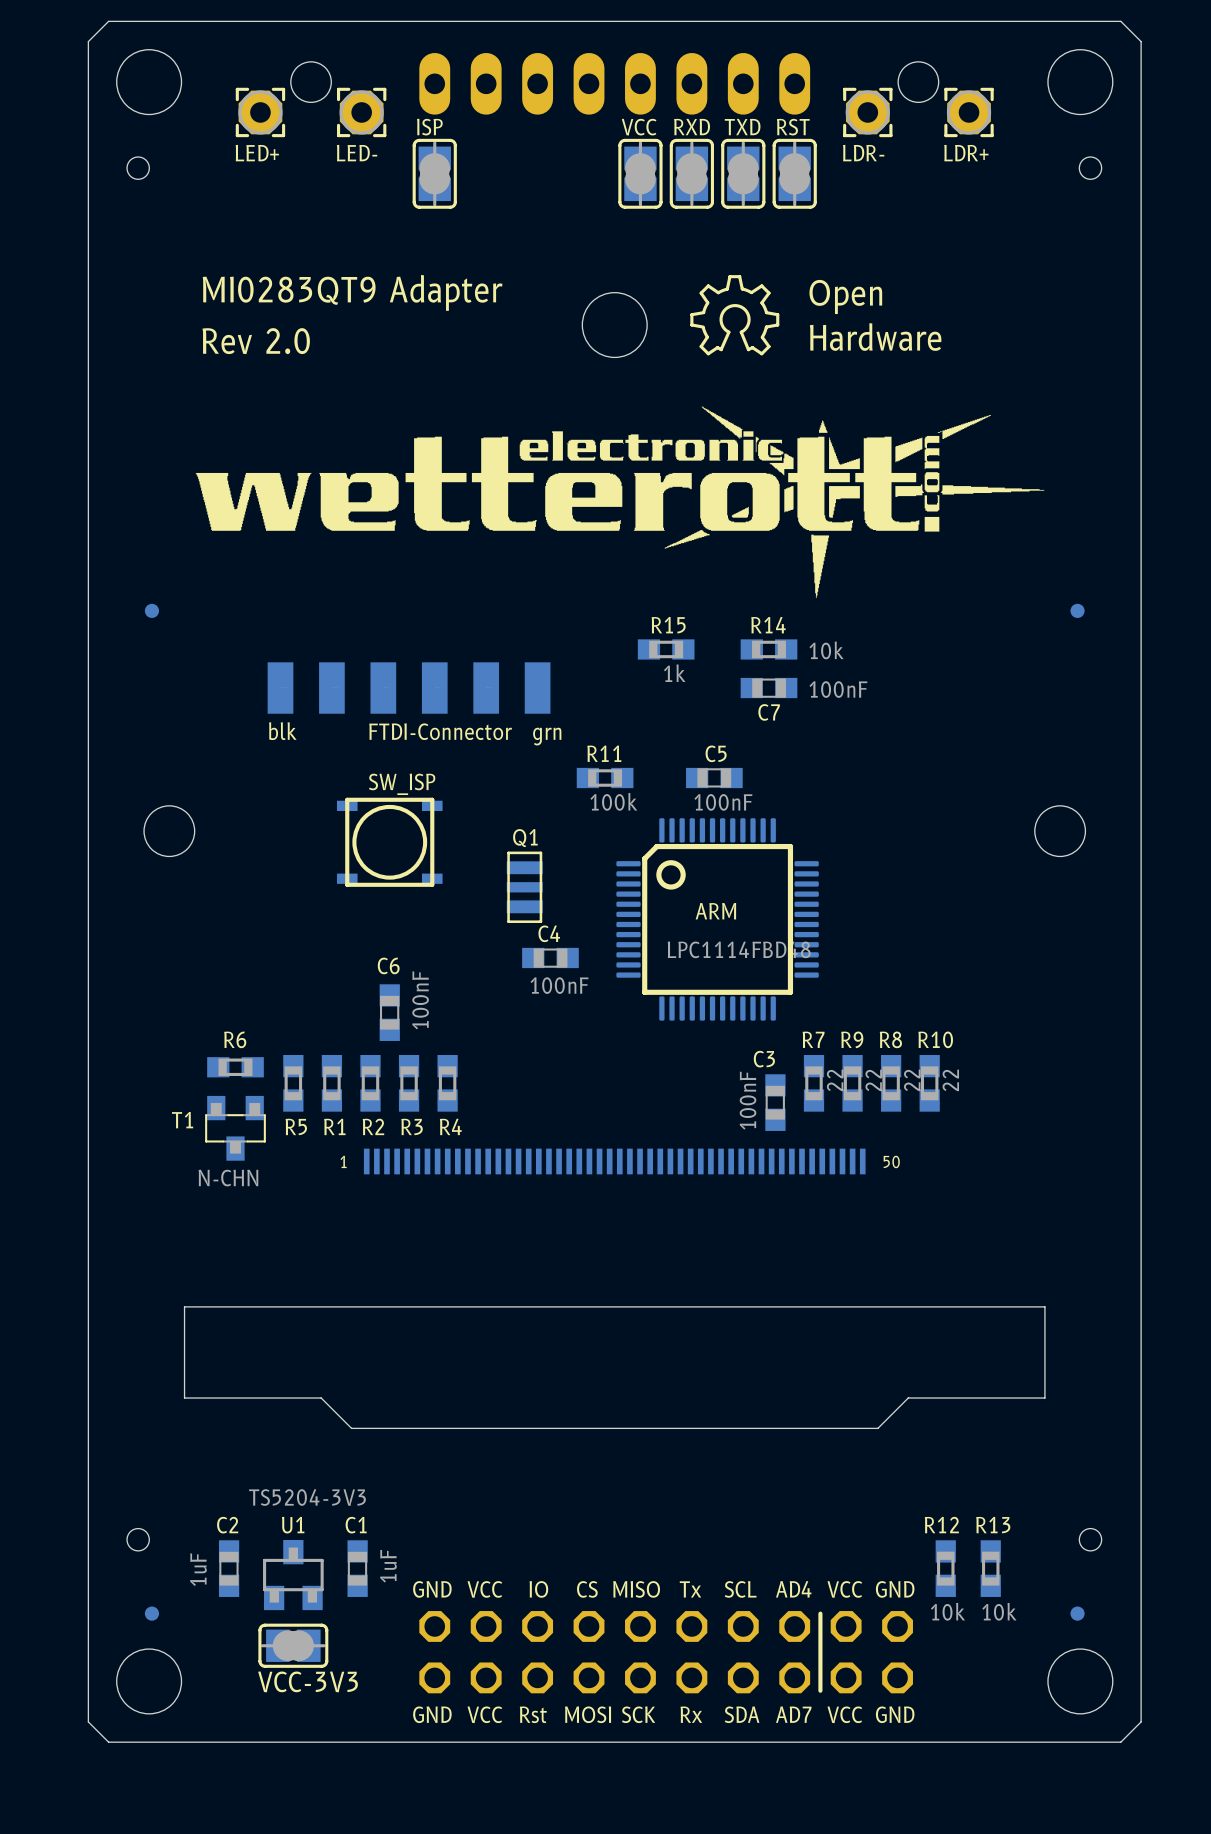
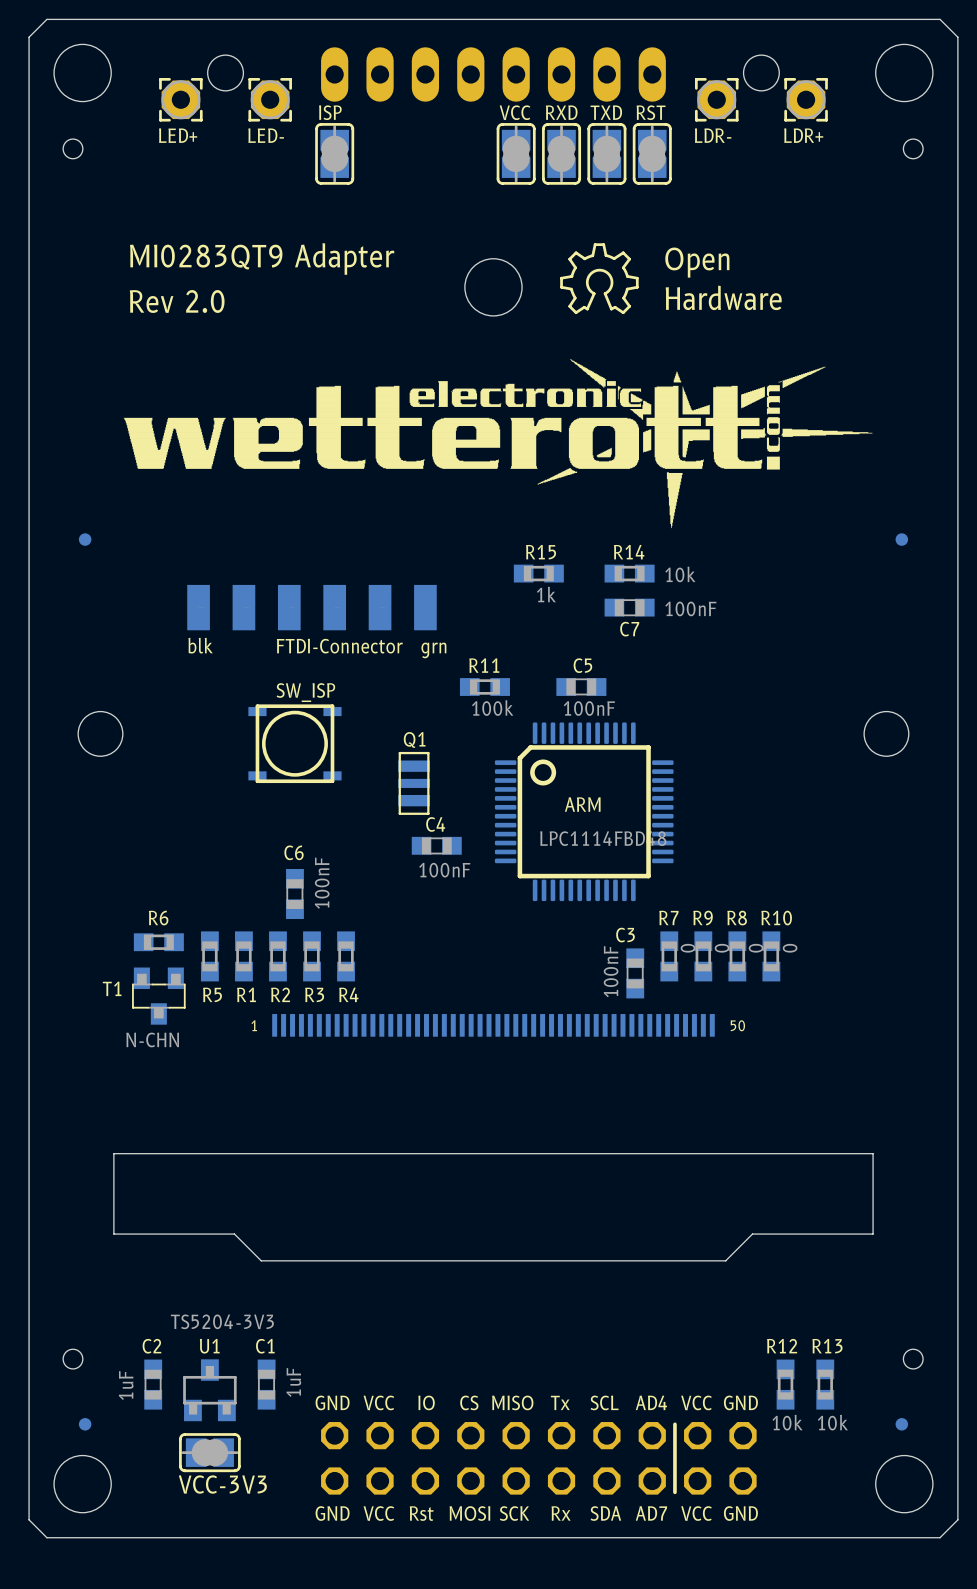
R7 value: 22 (835, 1080) -> 0 (687, 948)
R9 value: 22 (873, 1080) -> 0 (722, 948)
R8 value: 22 (912, 1080) -> 0 (756, 948)
R10 value: 22 (950, 1080) -> 0 (790, 948)

